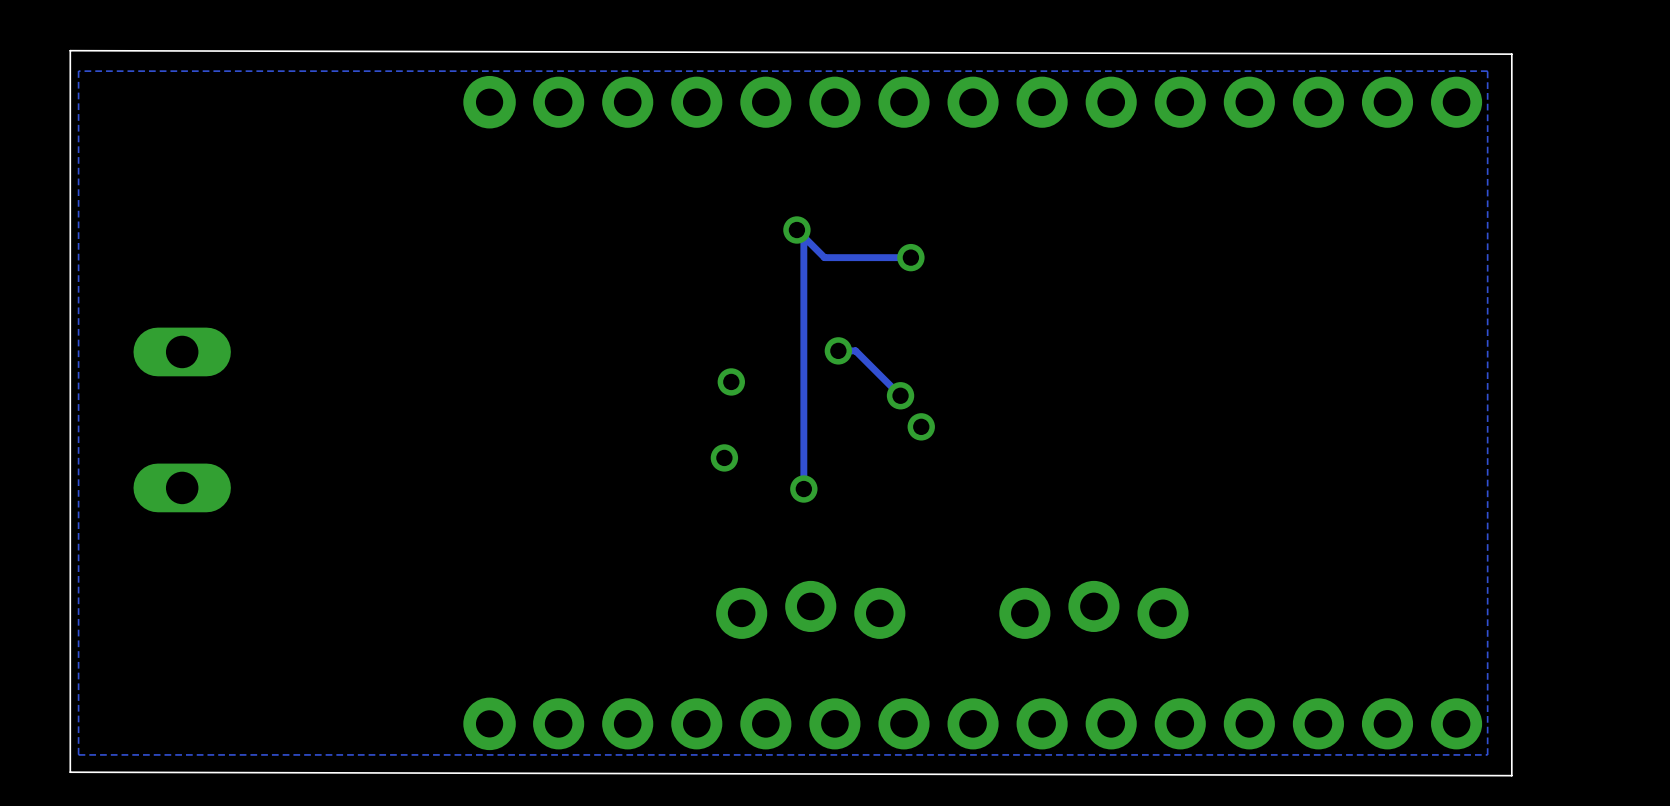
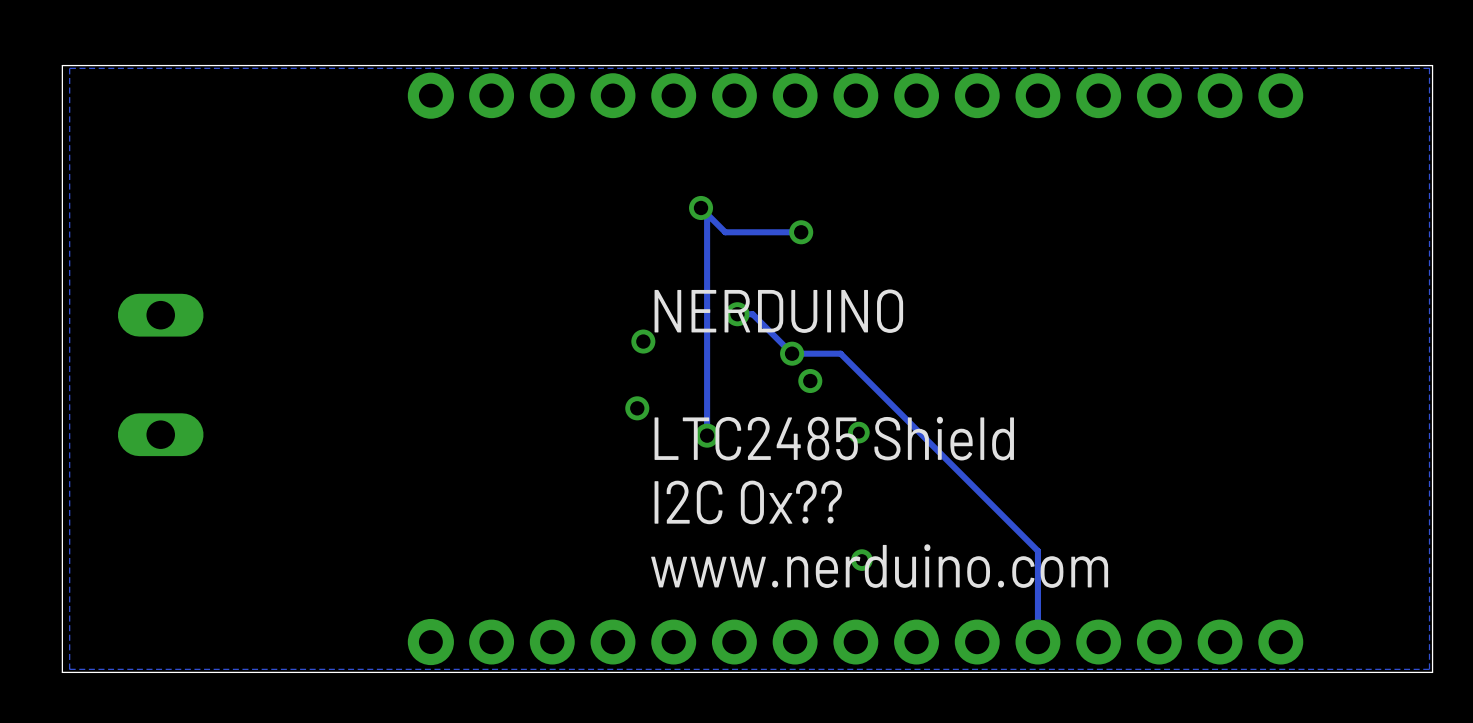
board edge: (70, 67) (70, 50) (1511, 54) (1511, 775) (70, 772) (70, 758) -> (62, 65) (1432, 65) (1432, 672) (62, 672)
zone outline: (1487, 71) (1487, 754) -> (1308, 68) (1429, 68) (1429, 669) (1308, 669)
text: none -> NERDUINO (778, 311)
track: none -> (792, 353) (840, 353) (1037, 550) (1037, 642)
via: none -> (858, 432)
text: none -> LTC2485 Shield (834, 438)
text: none -> I2C 0x?? (748, 502)
part: (810, 609) -> none
part: (1093, 609) -> none
via: none -> (861, 560)
text: none -> www.nerduino.com (879, 566)

